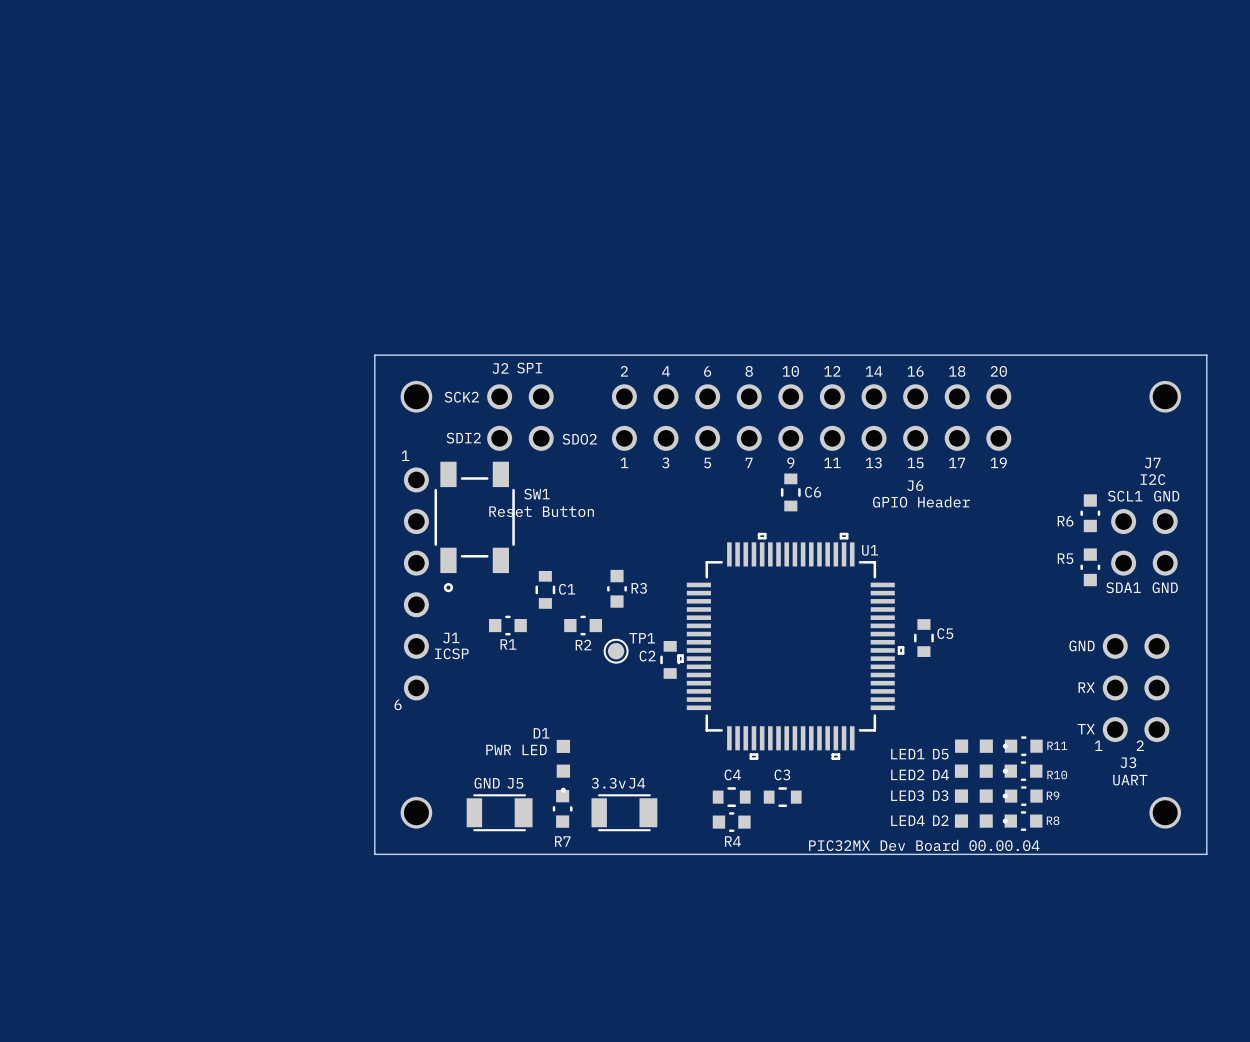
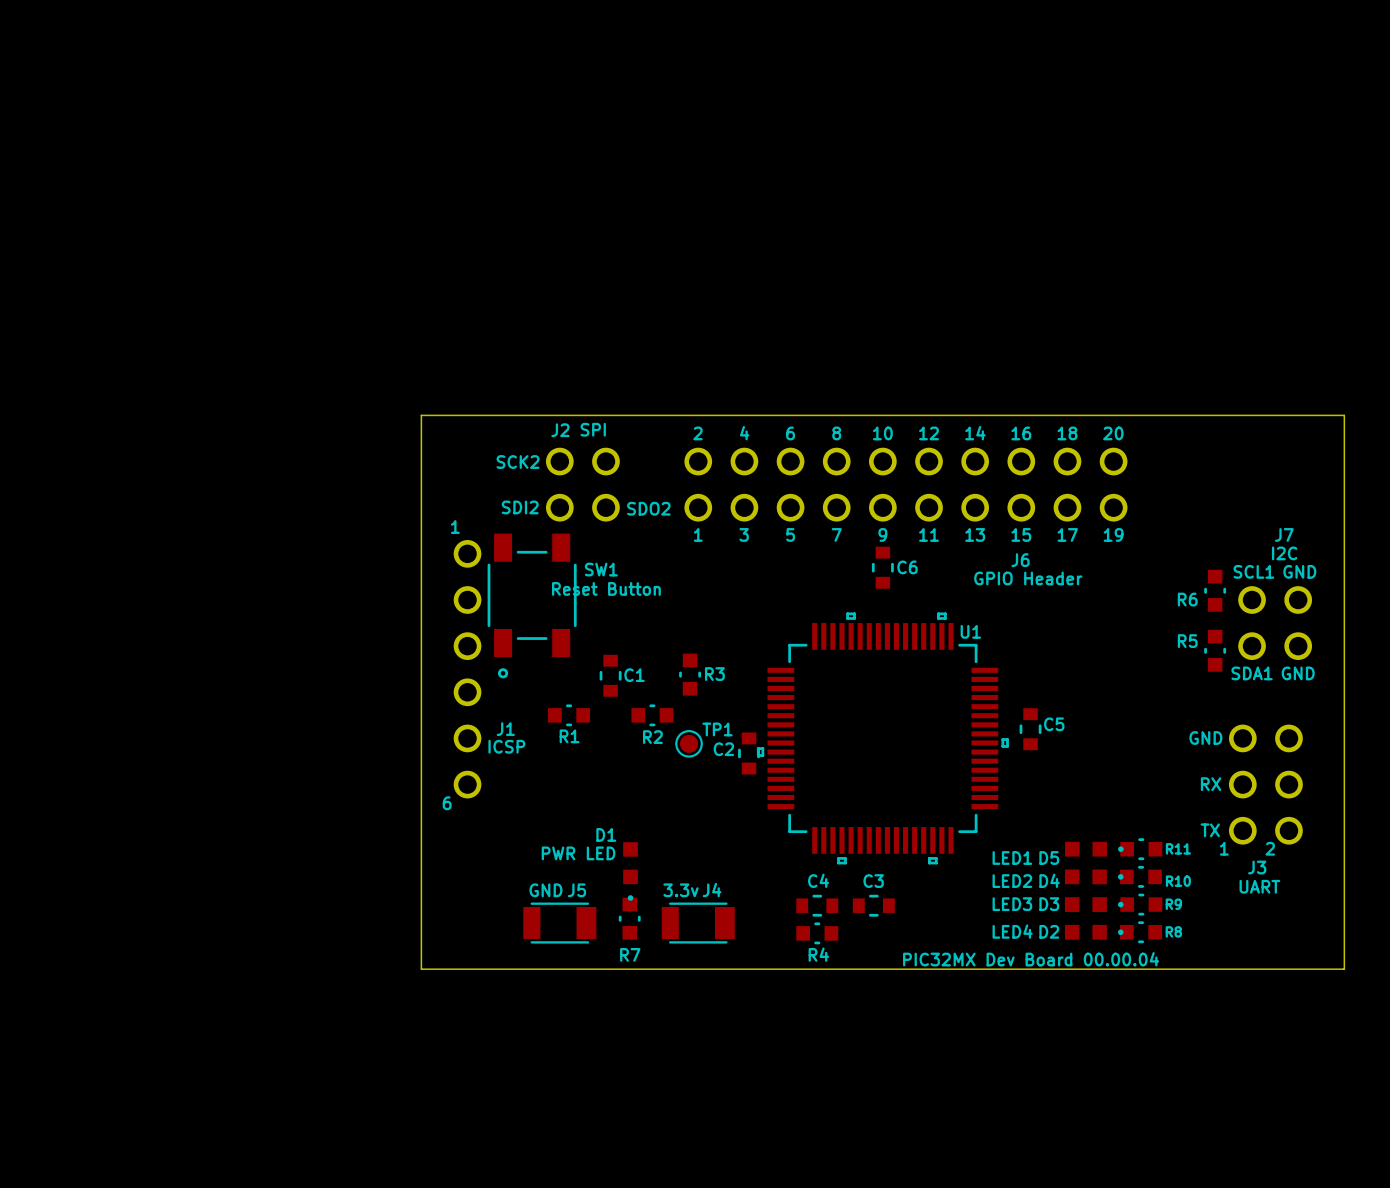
part: (416, 396) -> none
part: (1165, 396) -> none
part: (416, 812) -> none
part: (1165, 812) -> none

